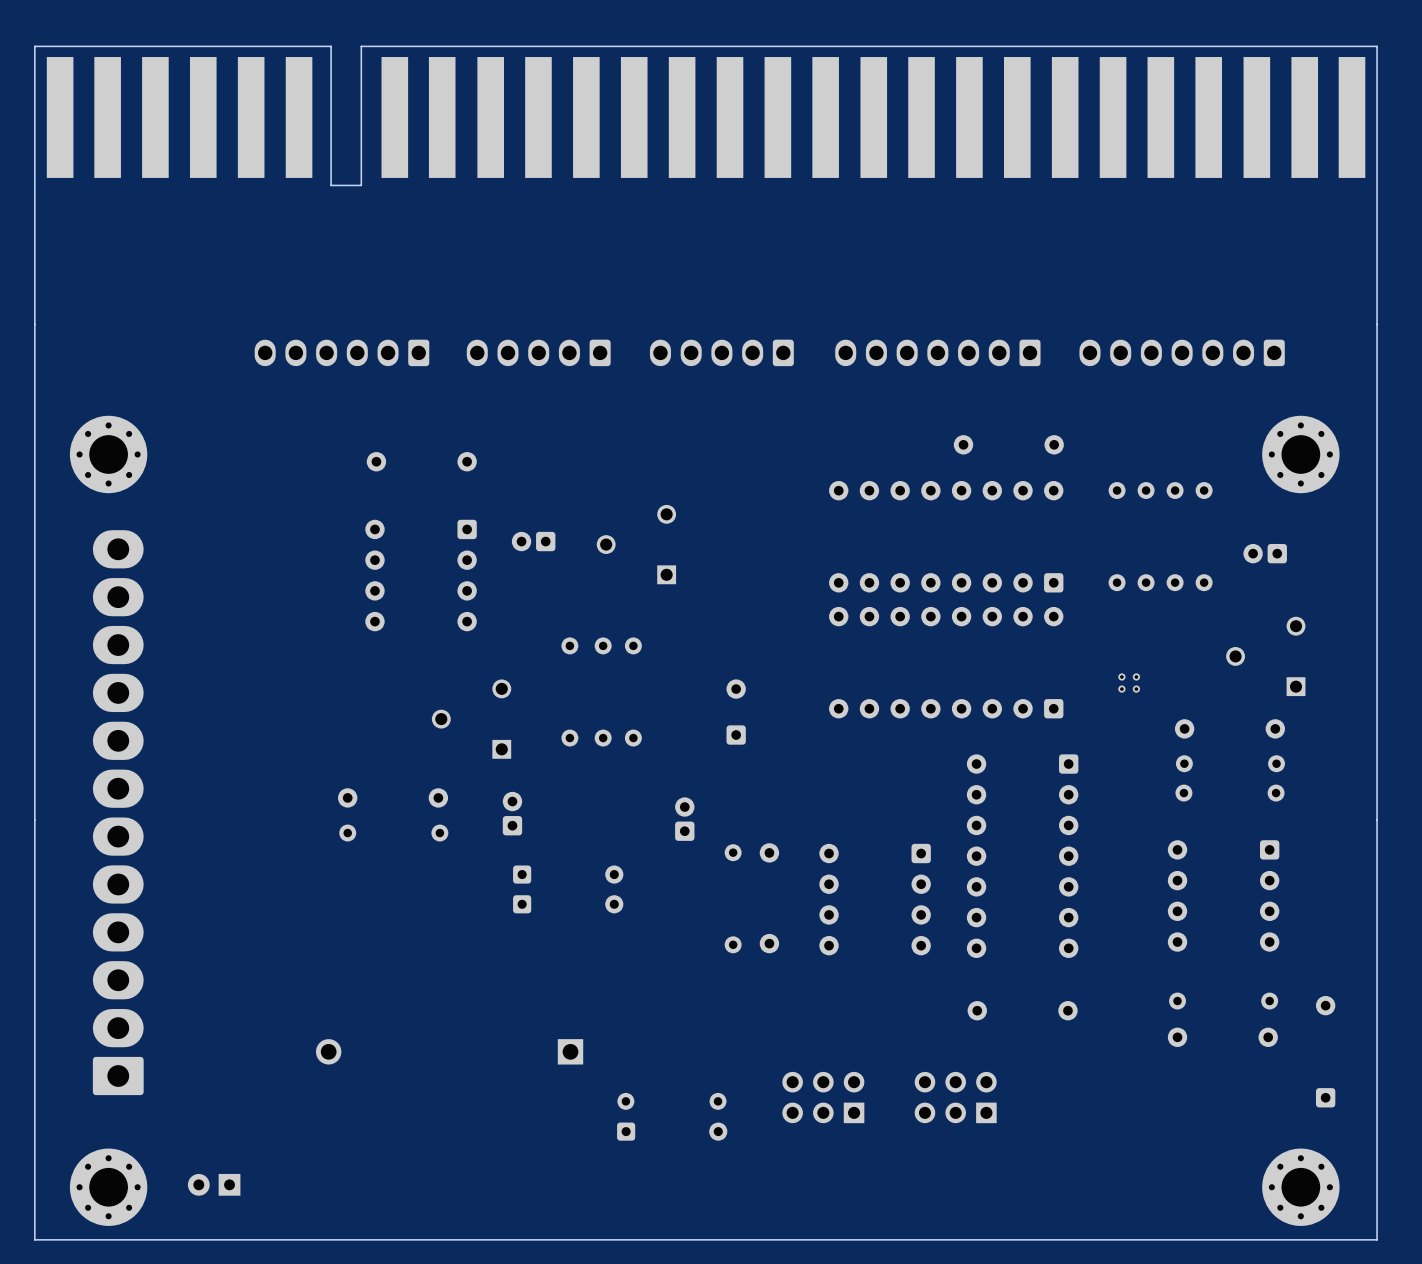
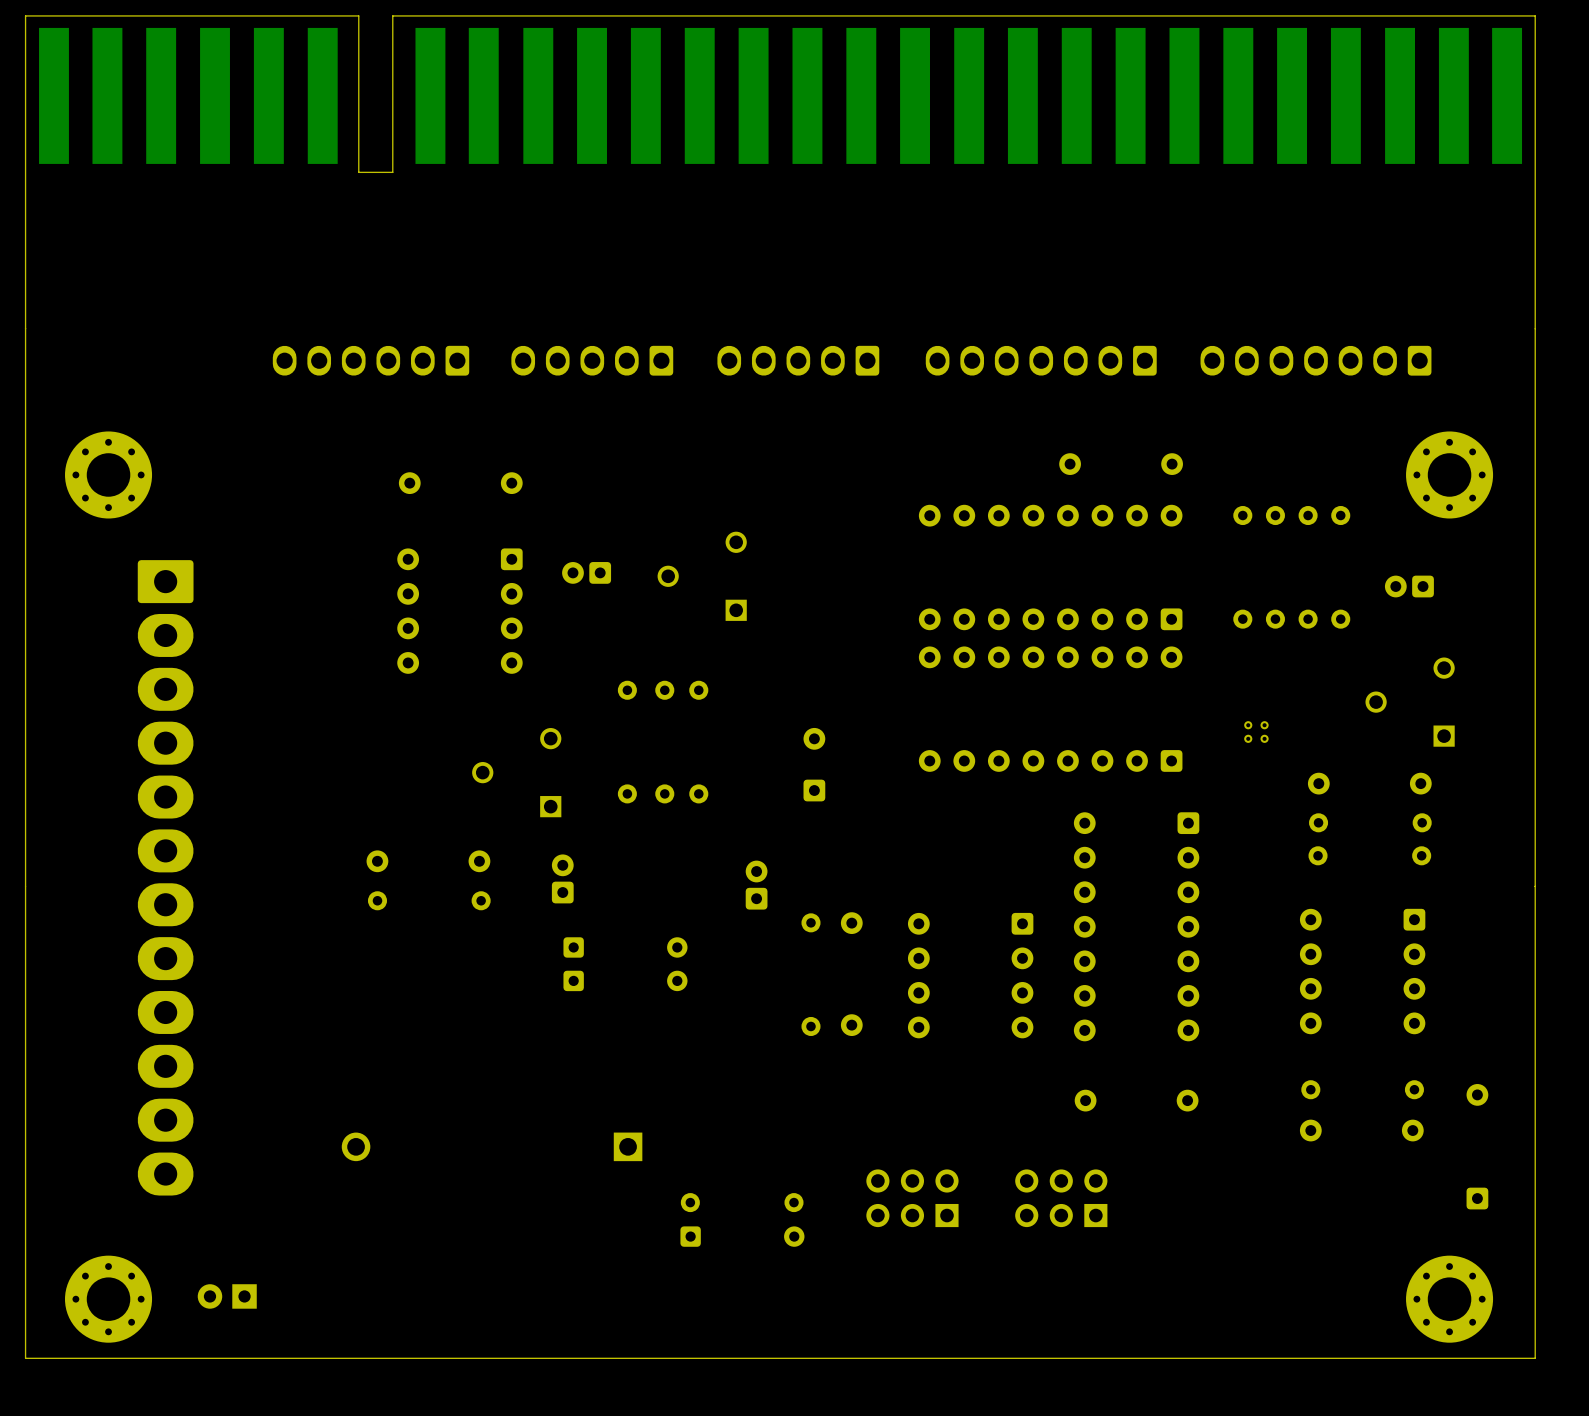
part: (118, 812) -> none
part: none -> (165, 877)

